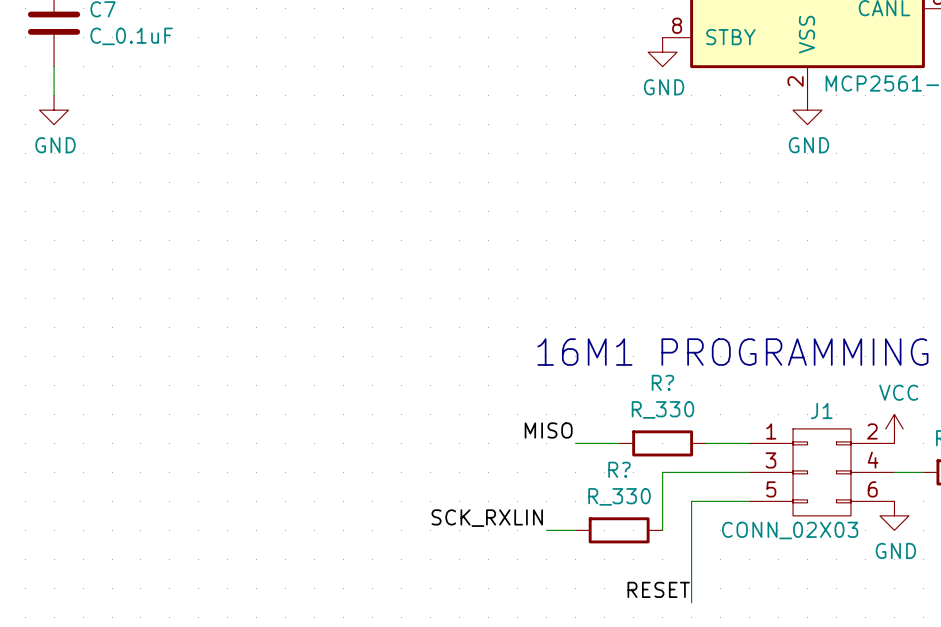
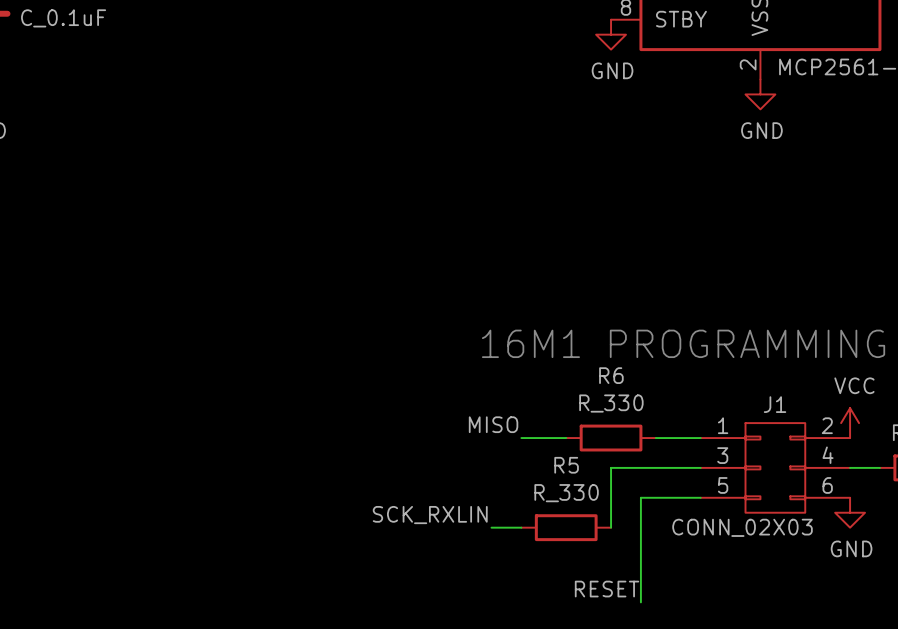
R? name: R? (662, 382) -> R6 (611, 375)
R? name: R? (619, 469) -> R5 (566, 465)

